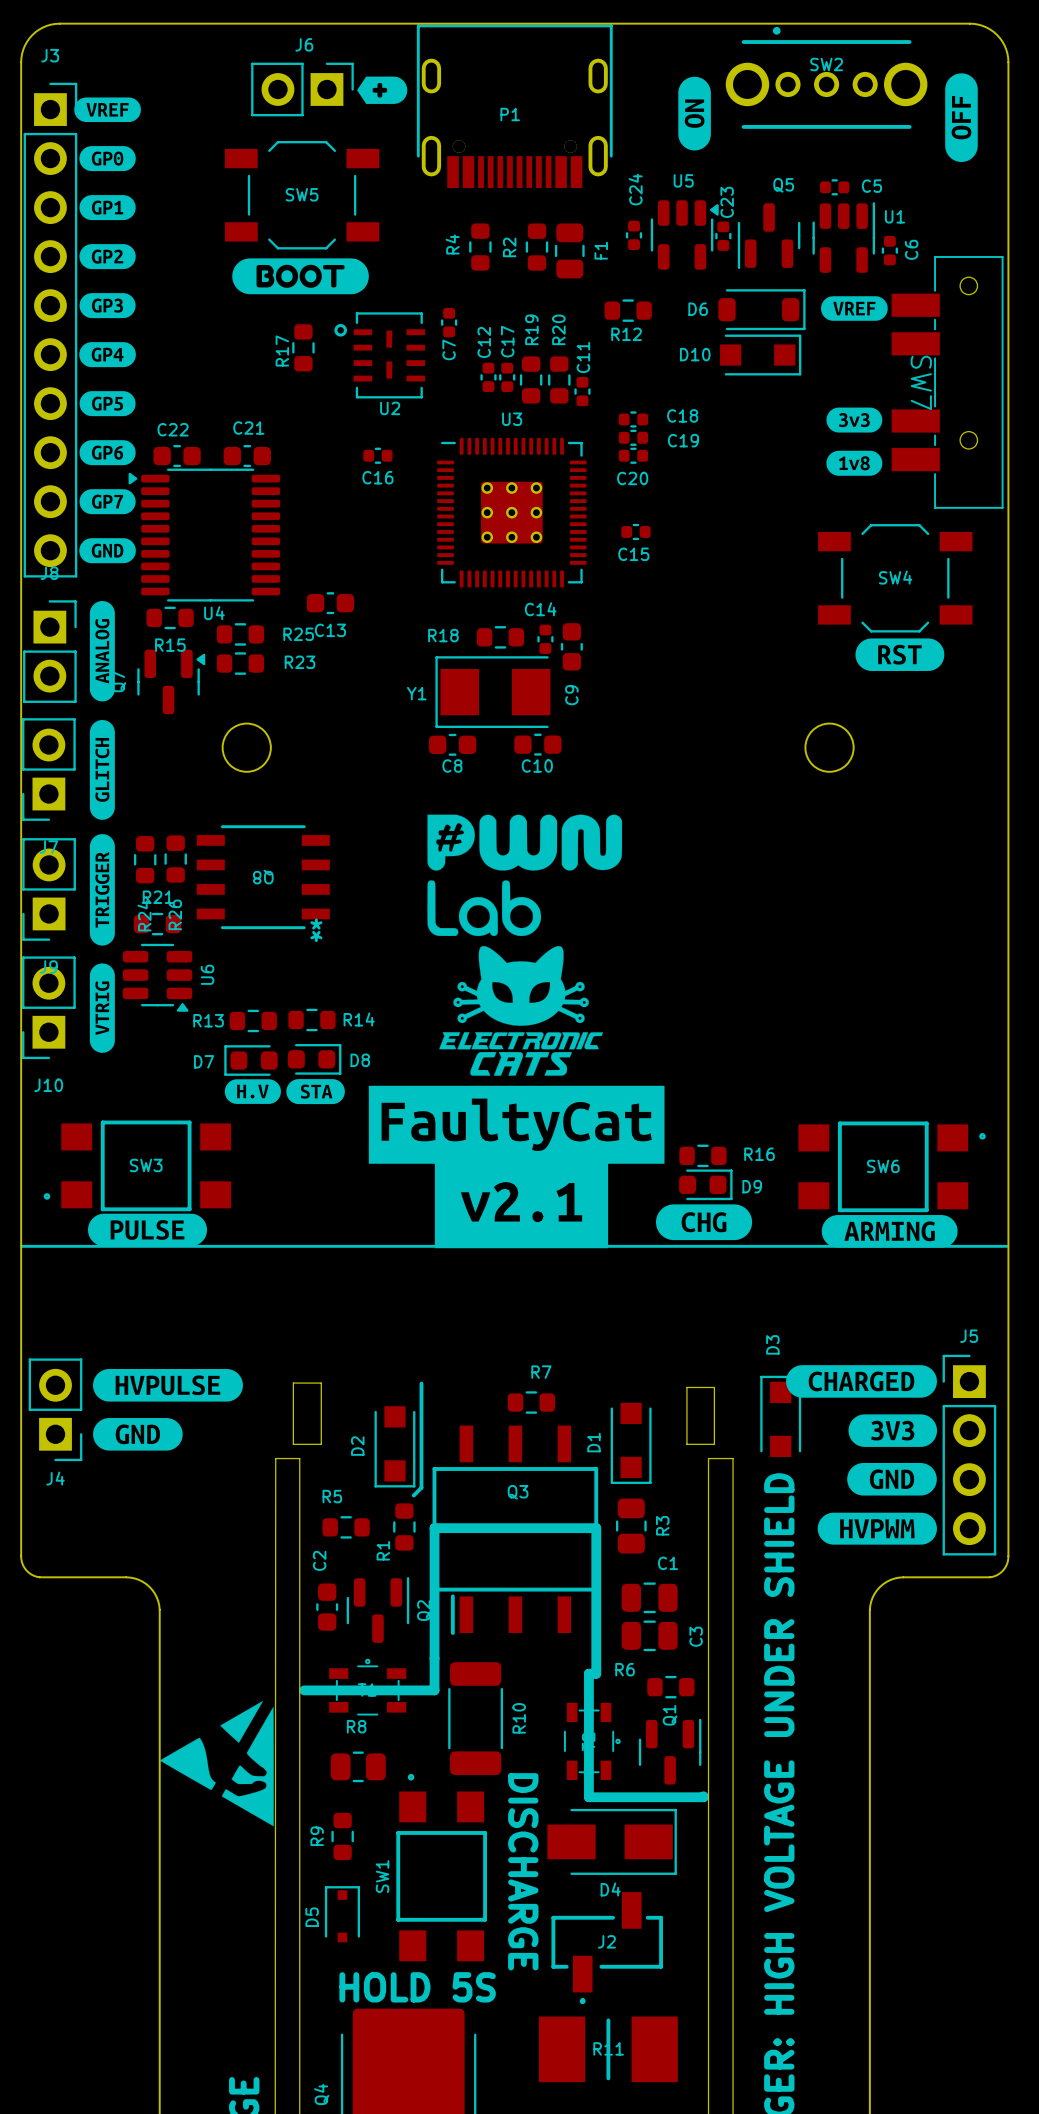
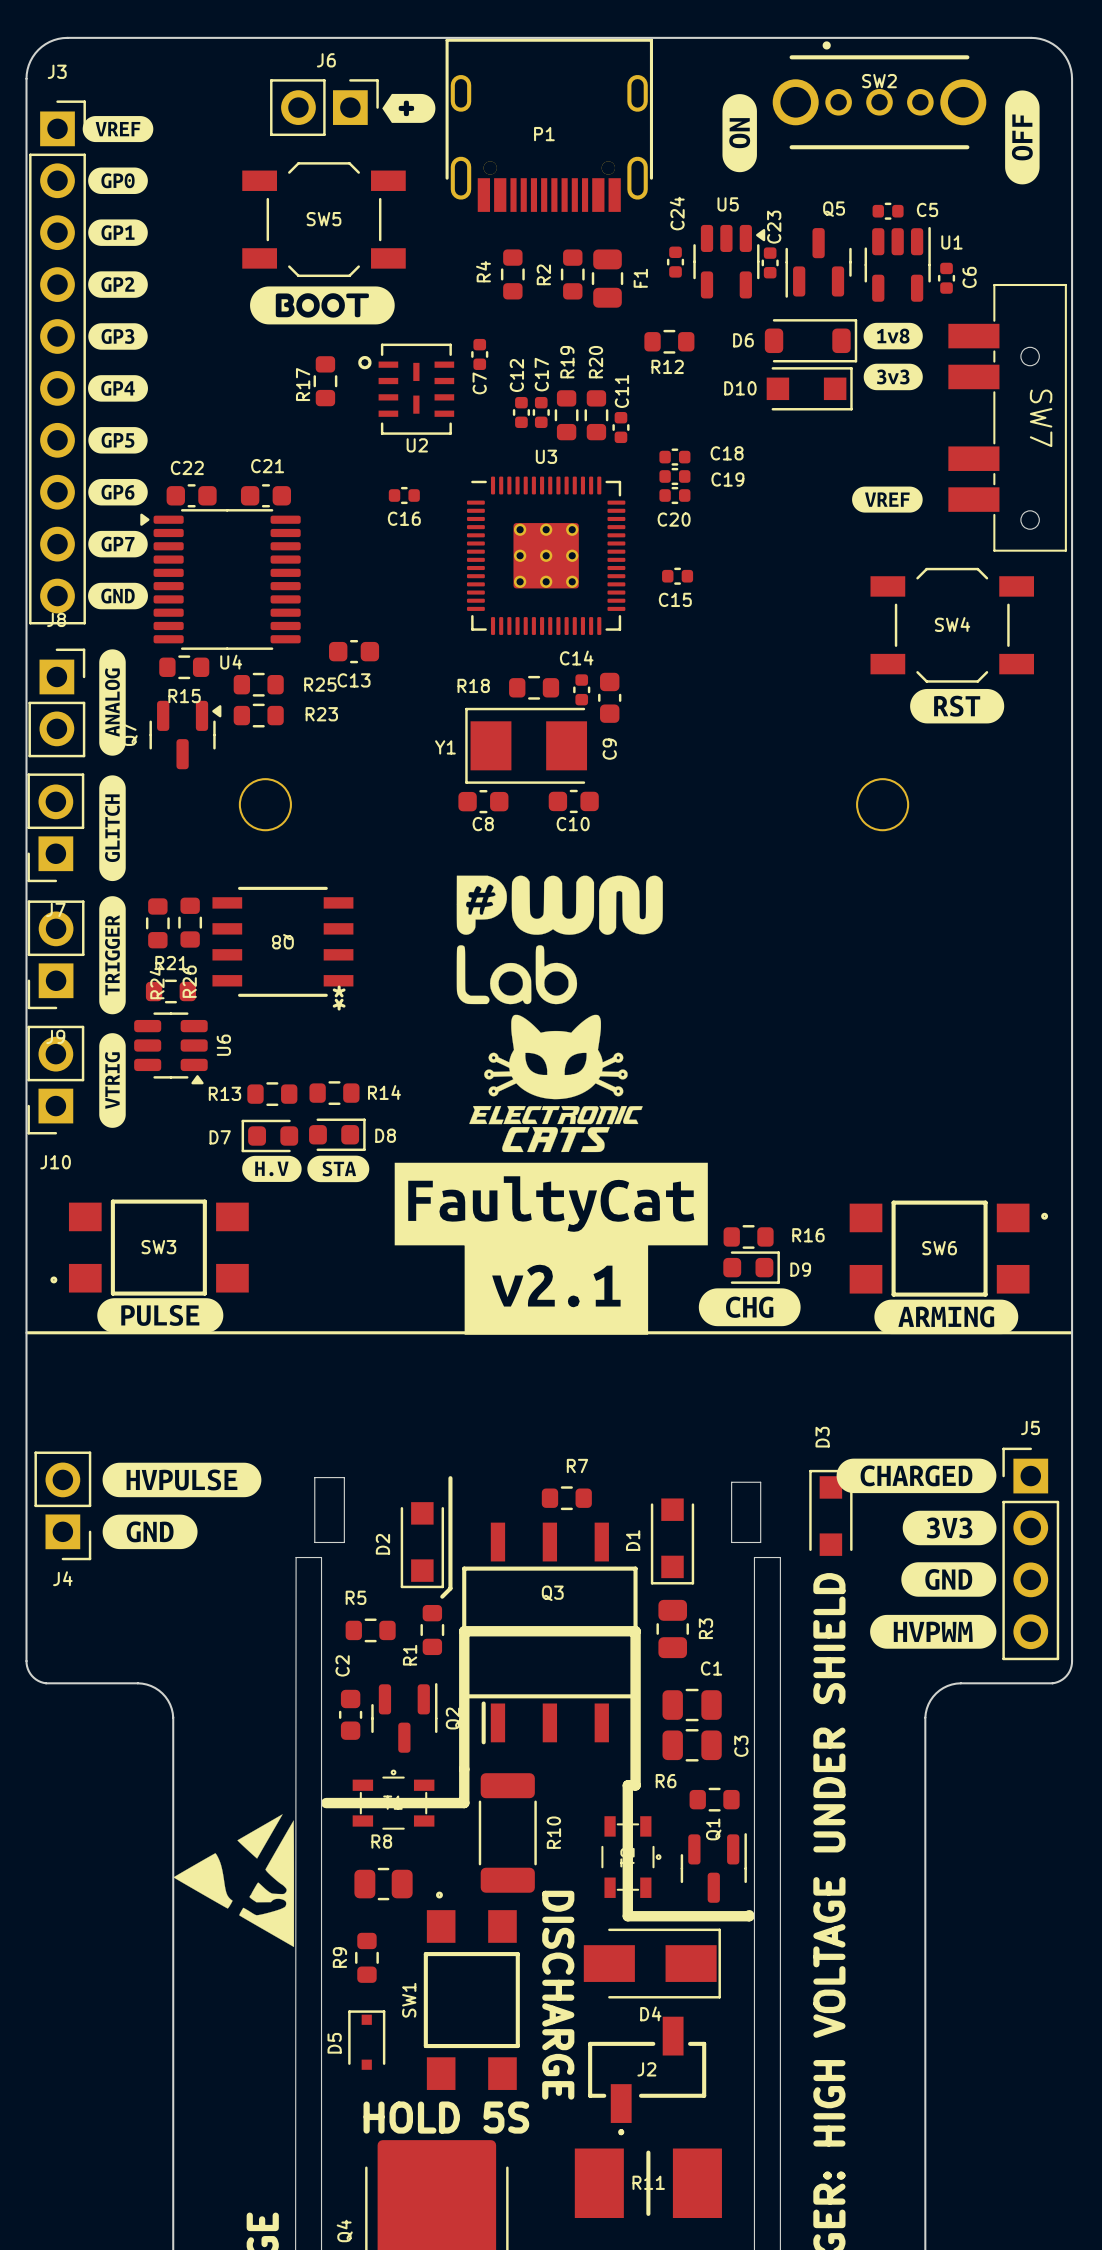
SW7 footprint: [891, 256, 1004, 509] -> [948, 283, 1067, 552]
drawing position: (854, 308) -> (887, 499)
SW7 name position: SW7 (921, 382) -> SW7 (1041, 418)
drawing position: (854, 420) -> (893, 376)
drawing position: (854, 463) -> (893, 336)

